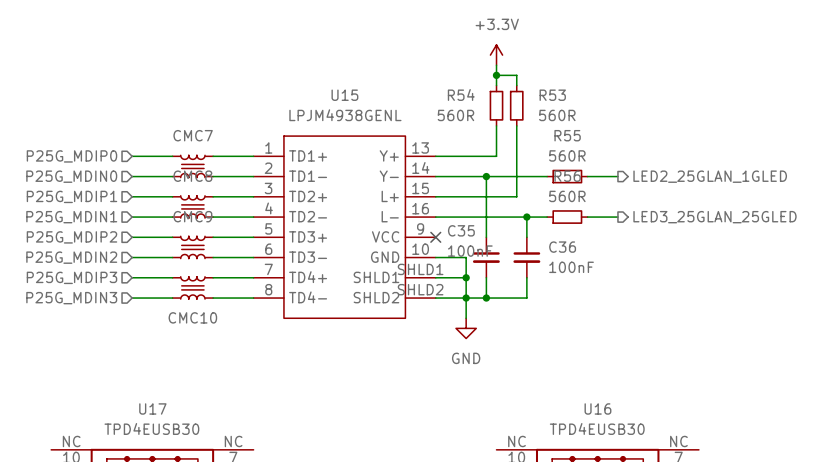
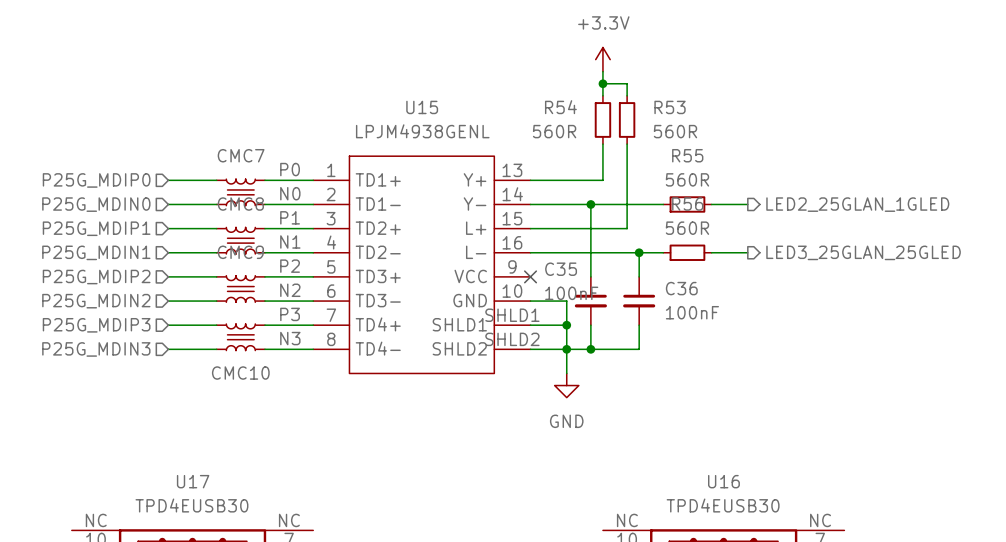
label: none -> P0 (290, 169)
label: none -> N0 (290, 193)
label: none -> P1 (290, 217)
label: none -> N1 (290, 241)
label: none -> P2 (290, 266)
label: none -> N2 (290, 290)
label: none -> P3 (290, 314)
label: none -> N3 (290, 338)

